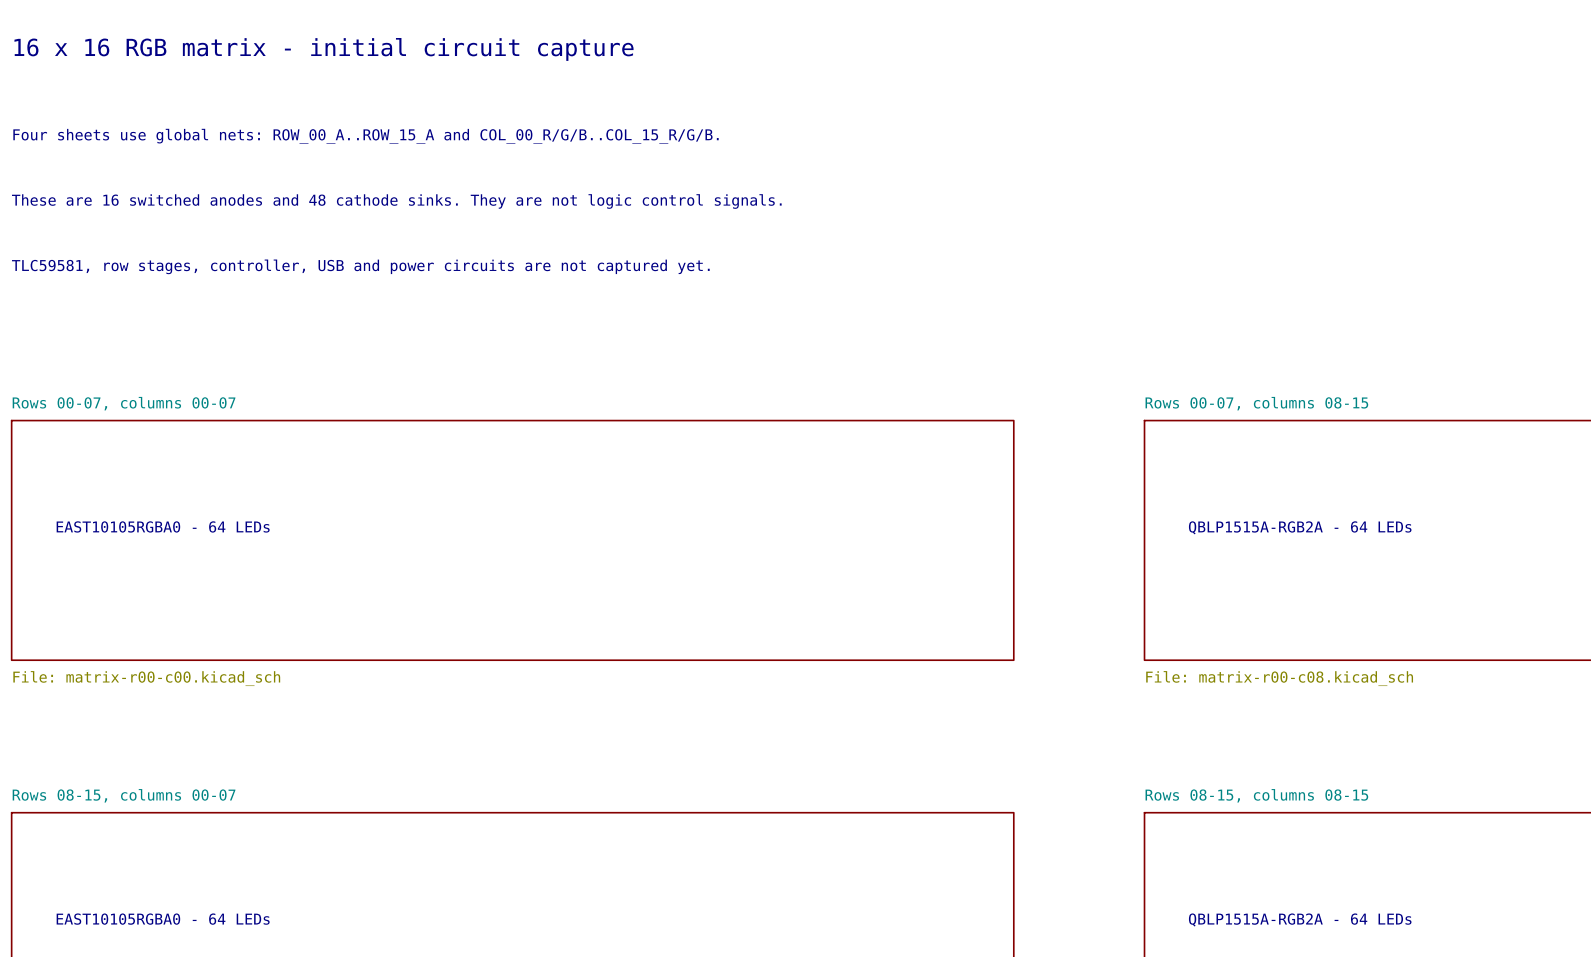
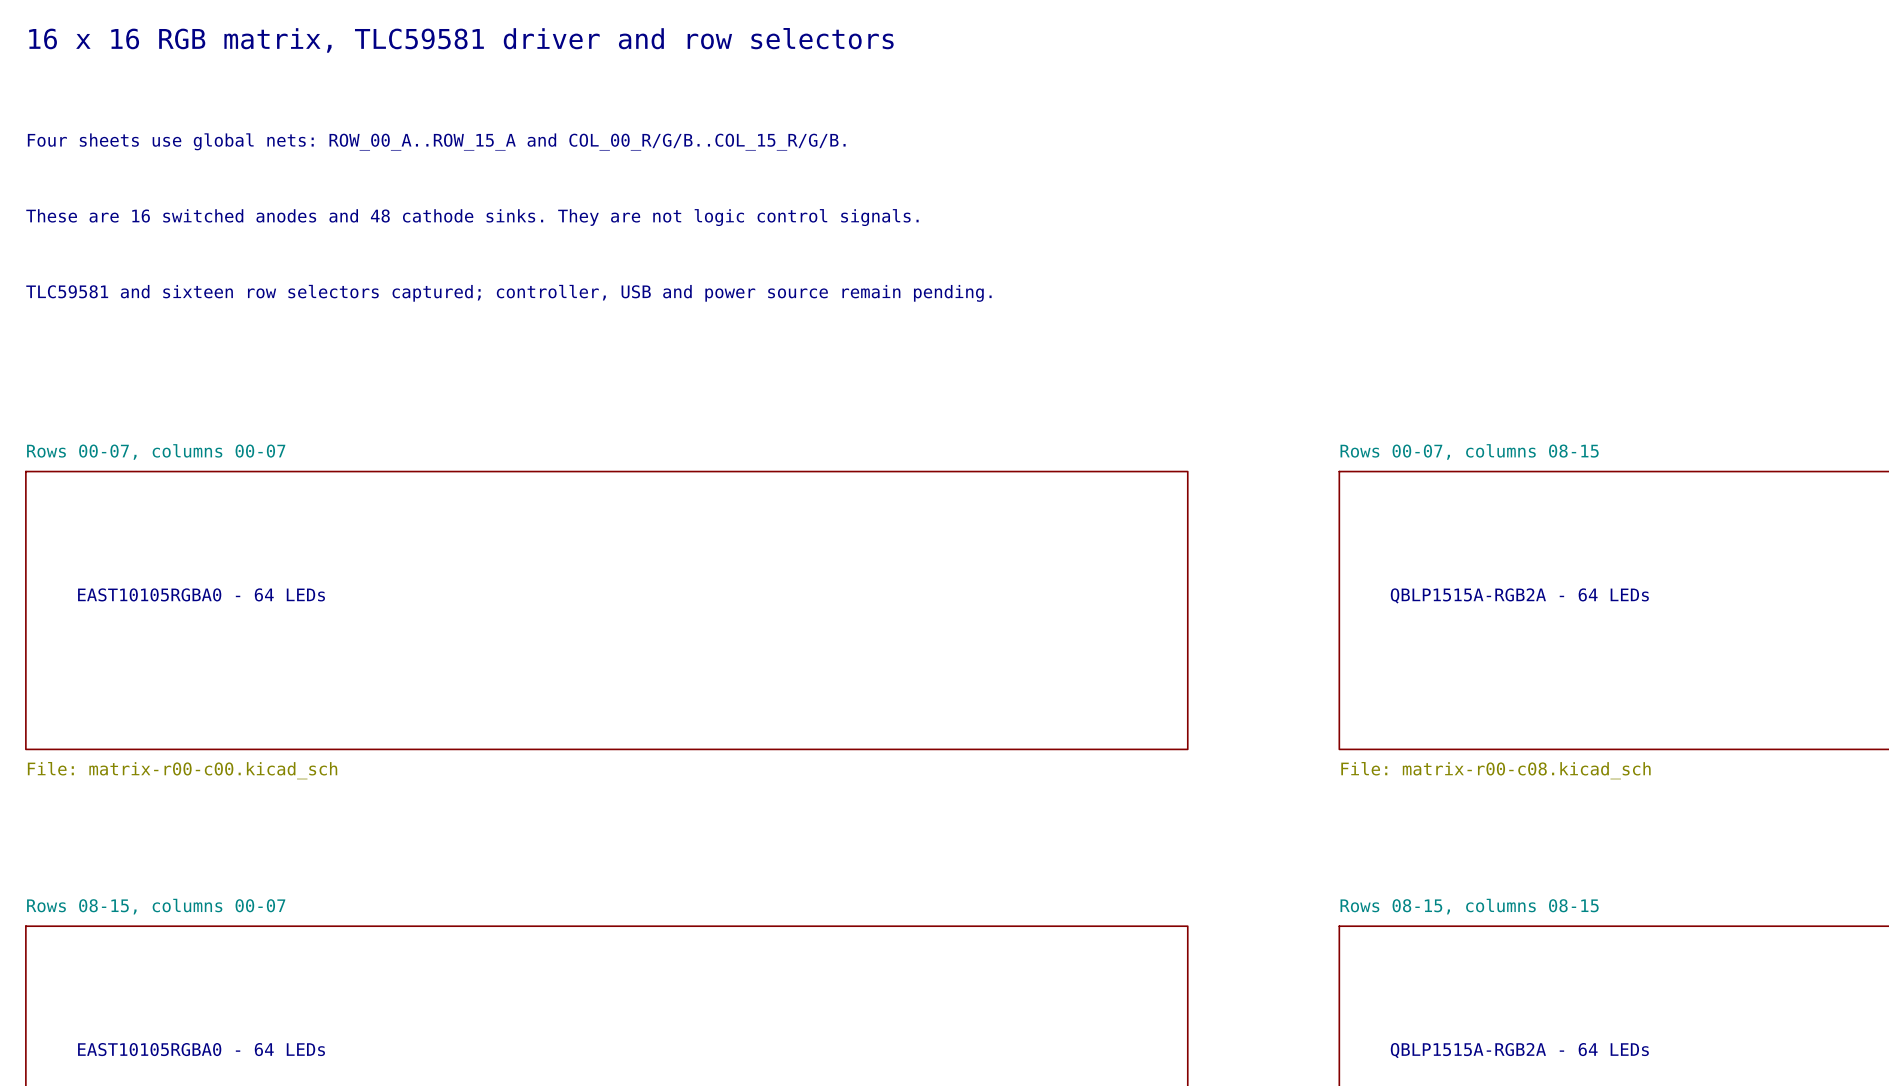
text: 16 x 16 RGB matrix - initial circuit capture (324, 49) -> 16 x 16 RGB matrix, TLC59581 driver and row selectors (461, 40)
text: TLC59581, row stages, controller, USB and power circuits are not captured yet. (360, 266) -> TLC59581 and sixteen row selectors captured; controller, USB and power source remain pending. (508, 293)

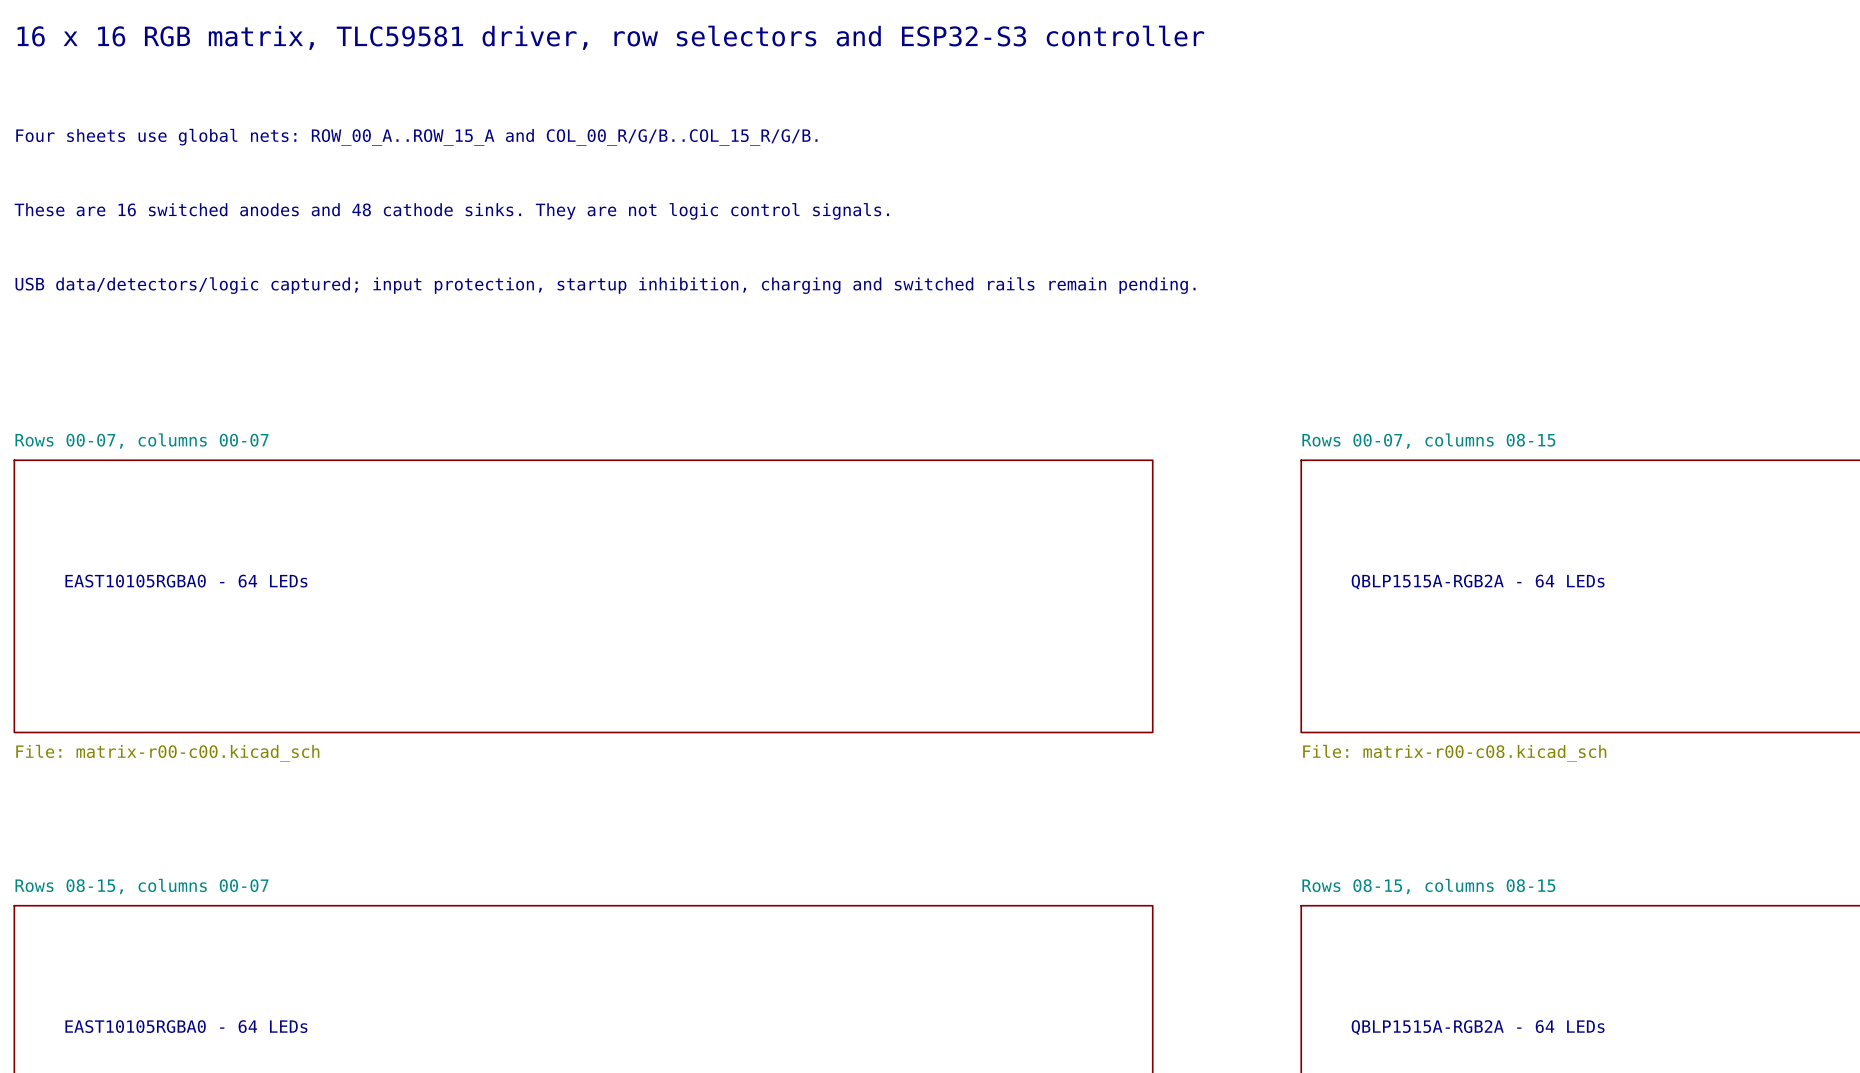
text: 16 x 16 RGB matrix, TLC59581 driver and row selectors (461, 40) -> 16 x 16 RGB matrix, TLC59581 driver, row selectors and ESP32-S3 controller (610, 37)
text: TLC59581 and sixteen row selectors captured; controller, USB and power source remain pending. (508, 293) -> USB data/detectors/logic captured; input protection, startup inhibition, charging and switched rails remain pending. (605, 285)

